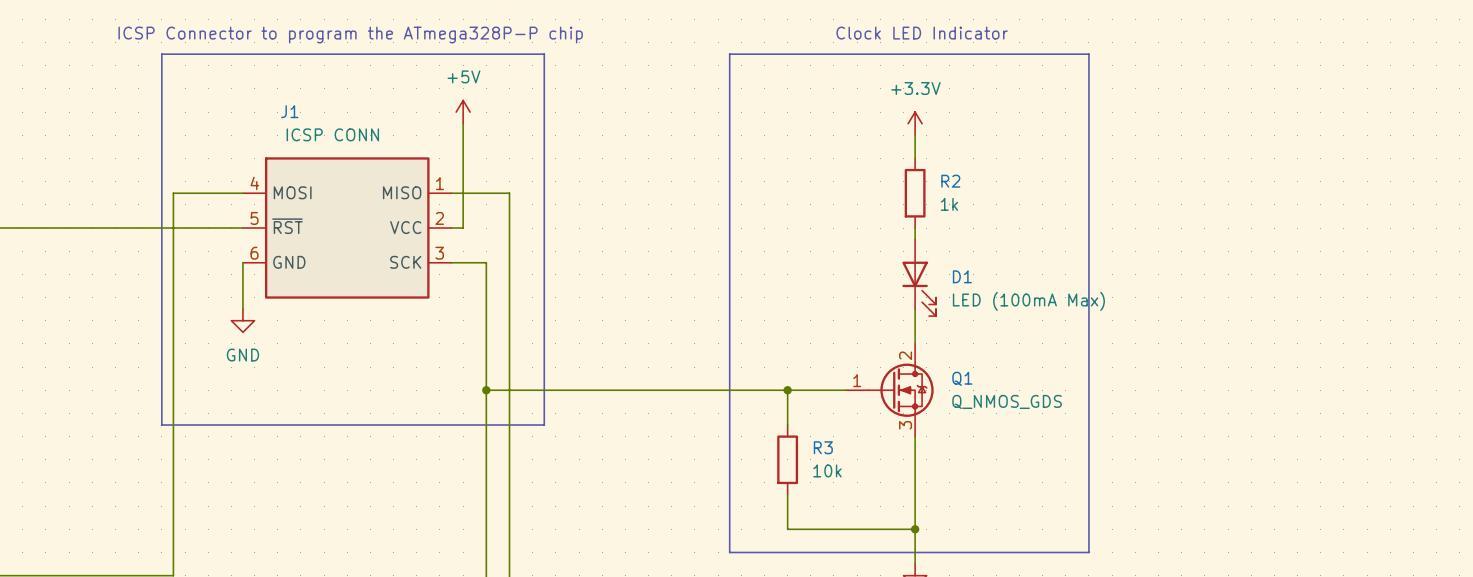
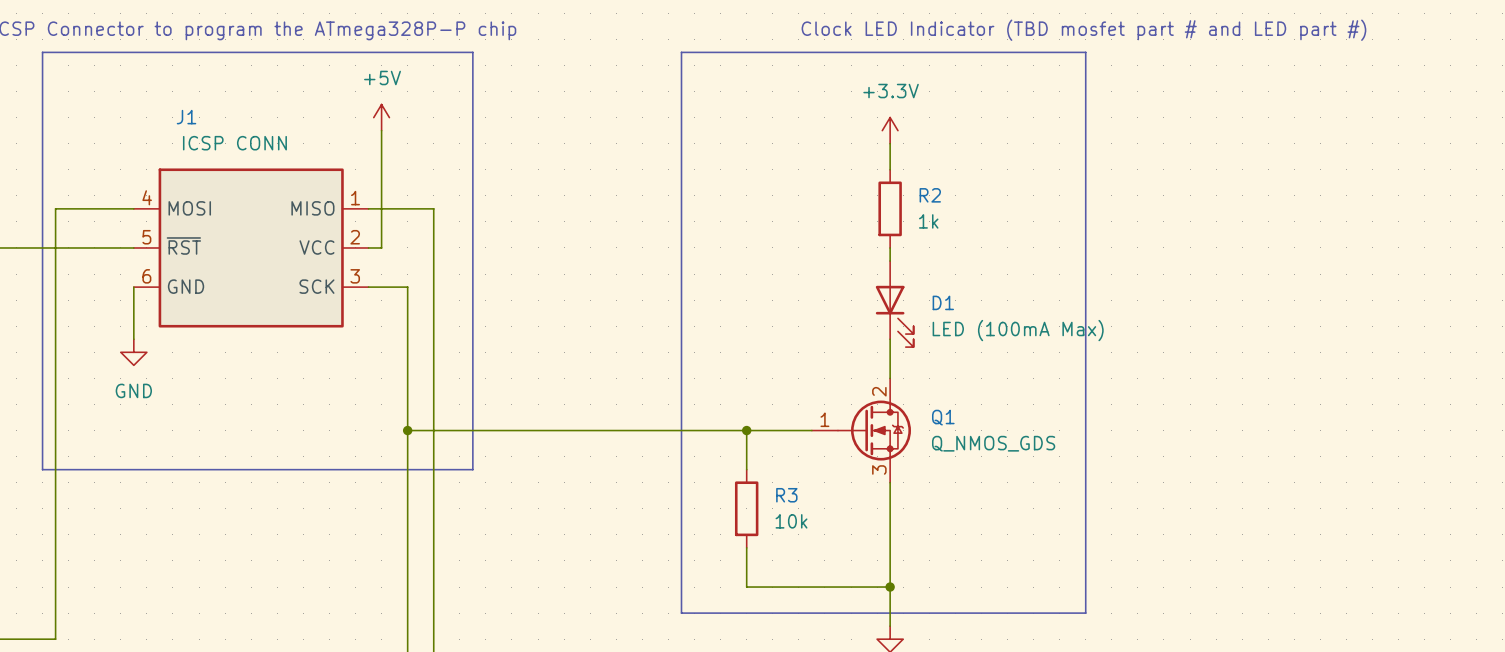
text: Clock LED Indicator (922, 33) -> Clock LED Indicator (TBD mosfet part # and LED part #) (1083, 30)

